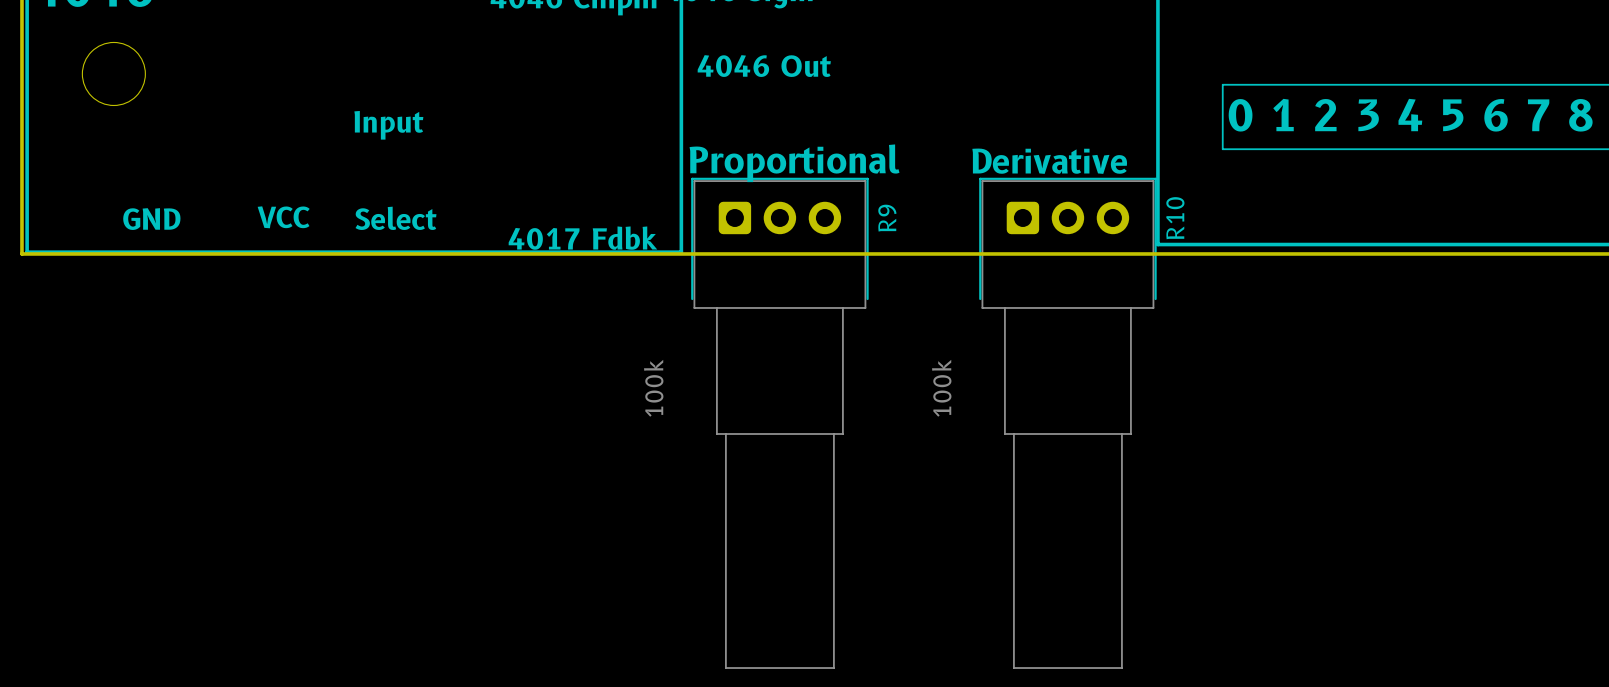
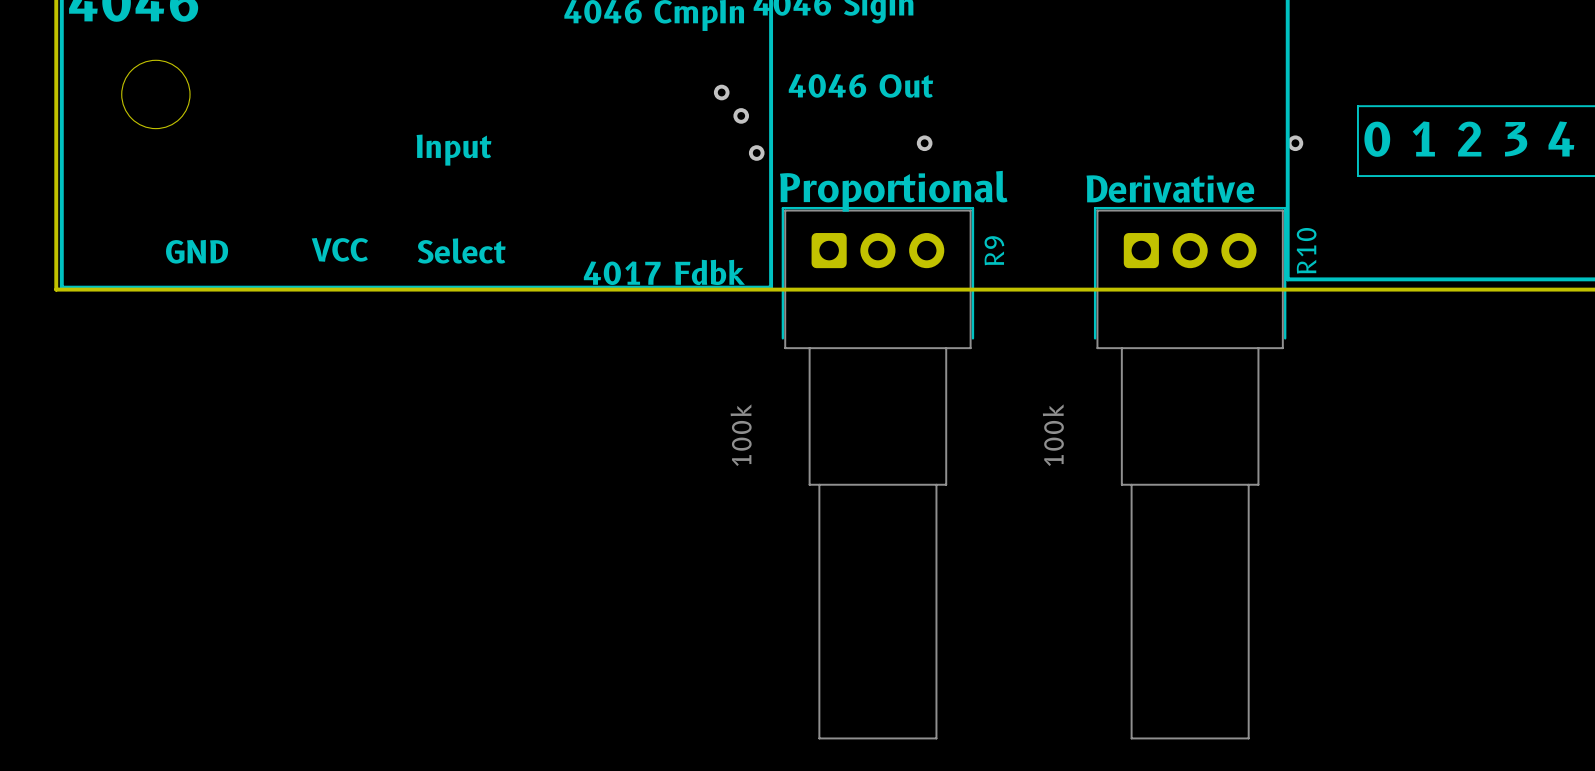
via: none -> (721, 92)
via: none -> (741, 115)
via: none -> (924, 143)
via: none -> (1295, 143)
via: none -> (756, 153)

